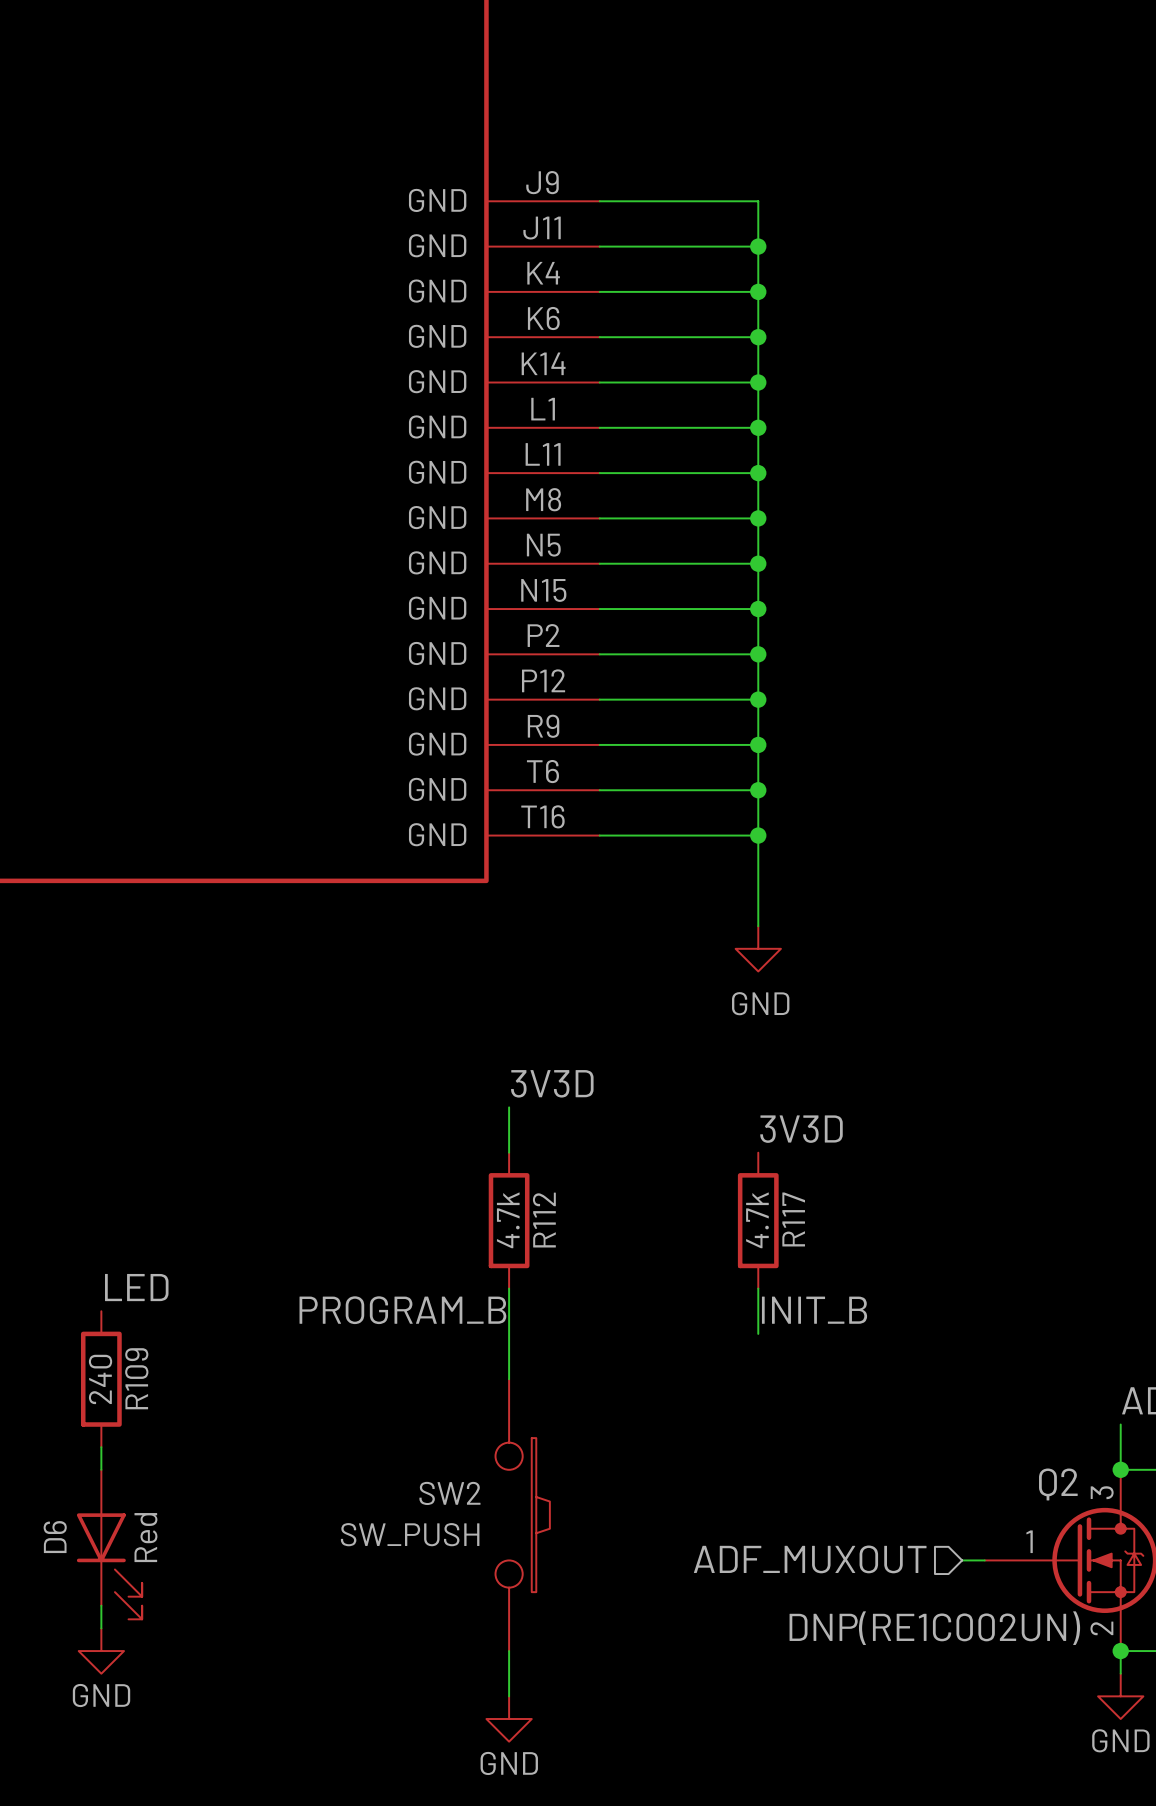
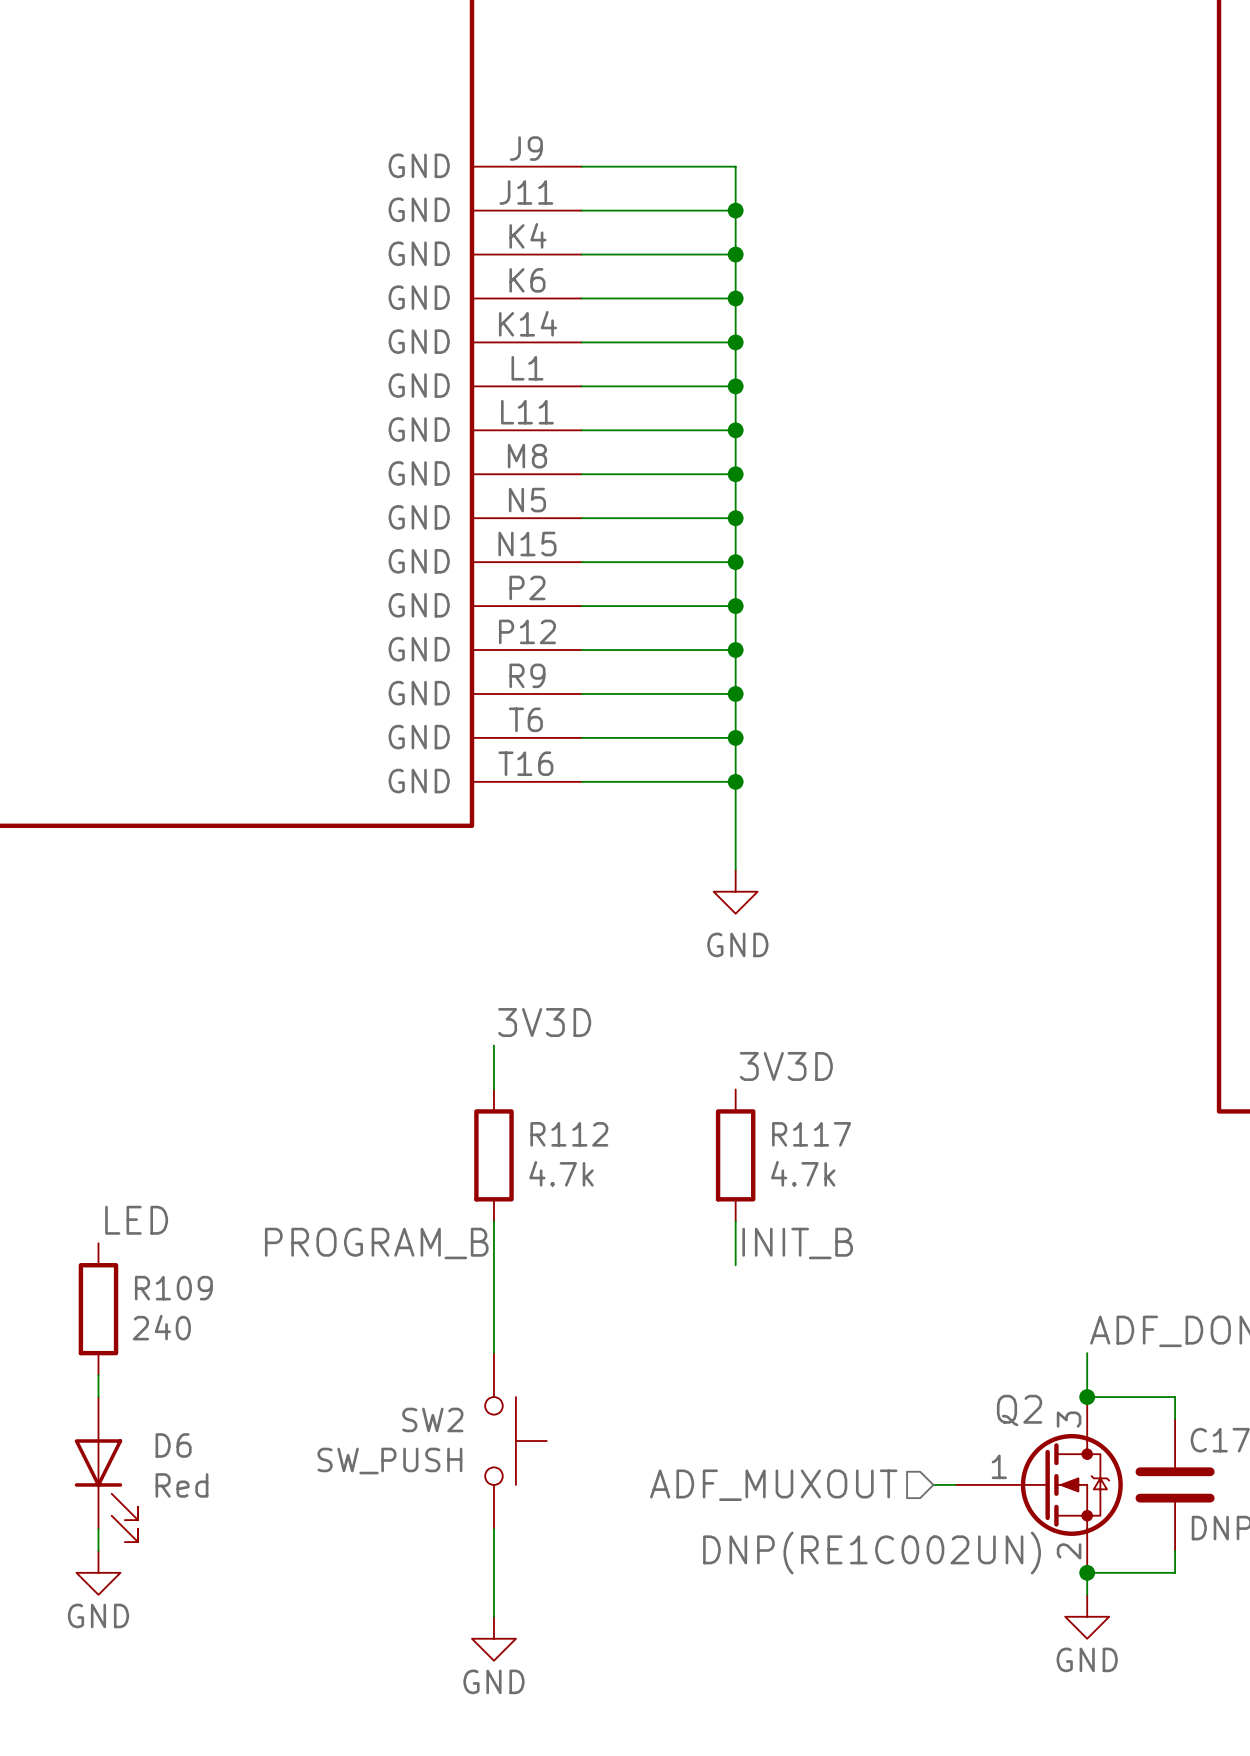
R117 name rotation: 0° (793, 1219) -> 90° clockwise (811, 1134)
R112 value rotation: 0° (508, 1220) -> 90° clockwise (561, 1173)
R112 name rotation: 0° (544, 1220) -> 90° clockwise (569, 1134)
R117 value rotation: 0° (757, 1220) -> 90° clockwise (803, 1173)
R109 name rotation: 0° (136, 1378) -> 90° clockwise (173, 1288)
R109 value rotation: 0° (100, 1379) -> 90° clockwise (161, 1327)
SW2 symbol: [495, 1379, 550, 1652] -> [485, 1353, 547, 1529]
D6 name rotation: 0° (55, 1537) -> 90° clockwise (173, 1445)
D6 name position: D6 (55, 1537) -> D6 (173, 1445)
D6 value rotation: 0° (145, 1537) -> 90° clockwise (181, 1485)

